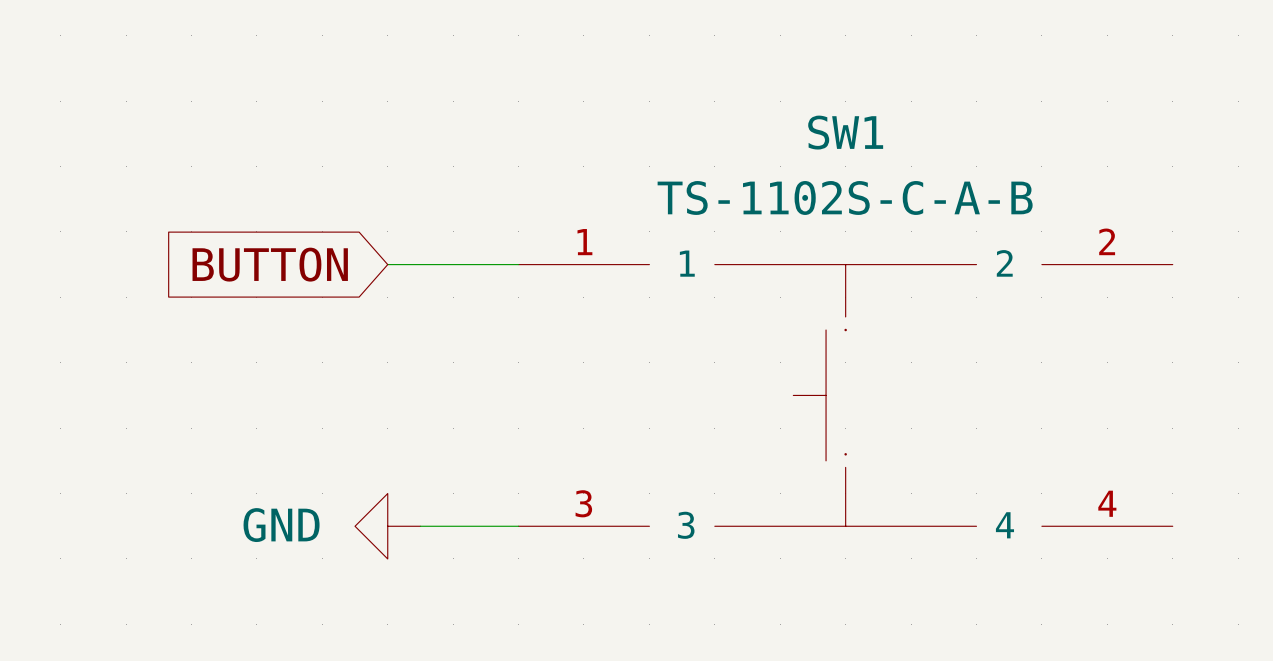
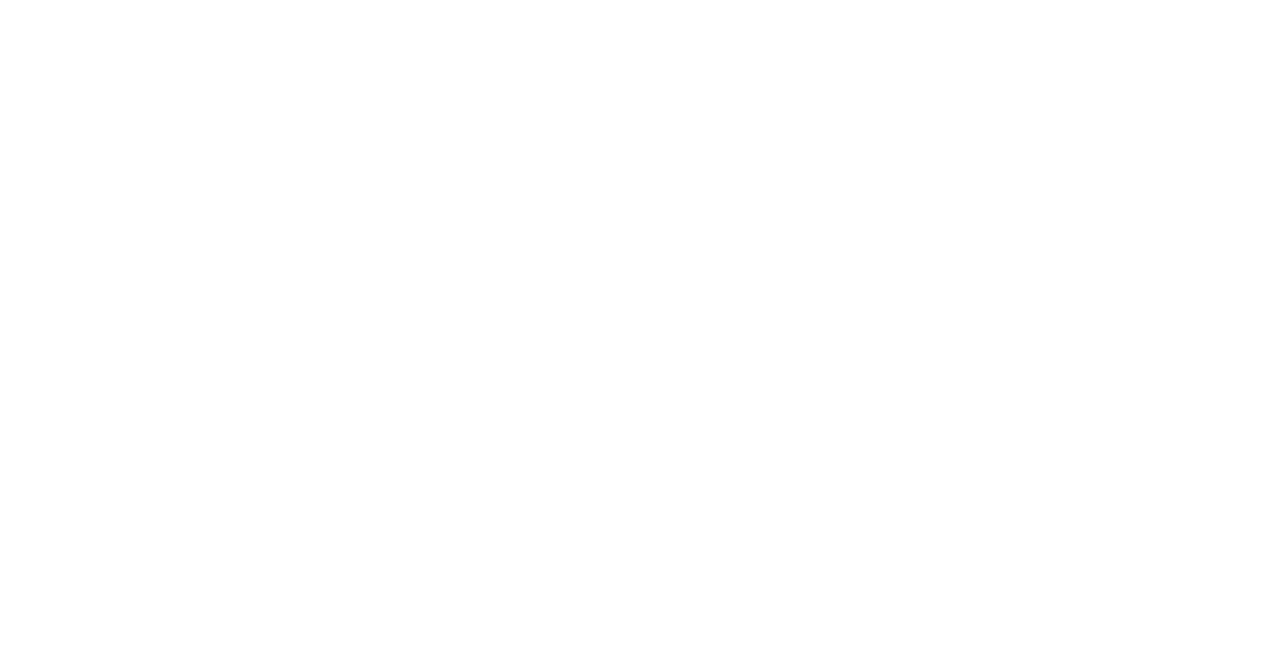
global label: BUTTON (270, 264) -> none
wire: (387, 264) (518, 264) -> none
SW1: TS-1102S-C-A-B (845, 395) -> none
power symbol: GND (387, 526) -> none
wire: (420, 526) (518, 526) -> none

